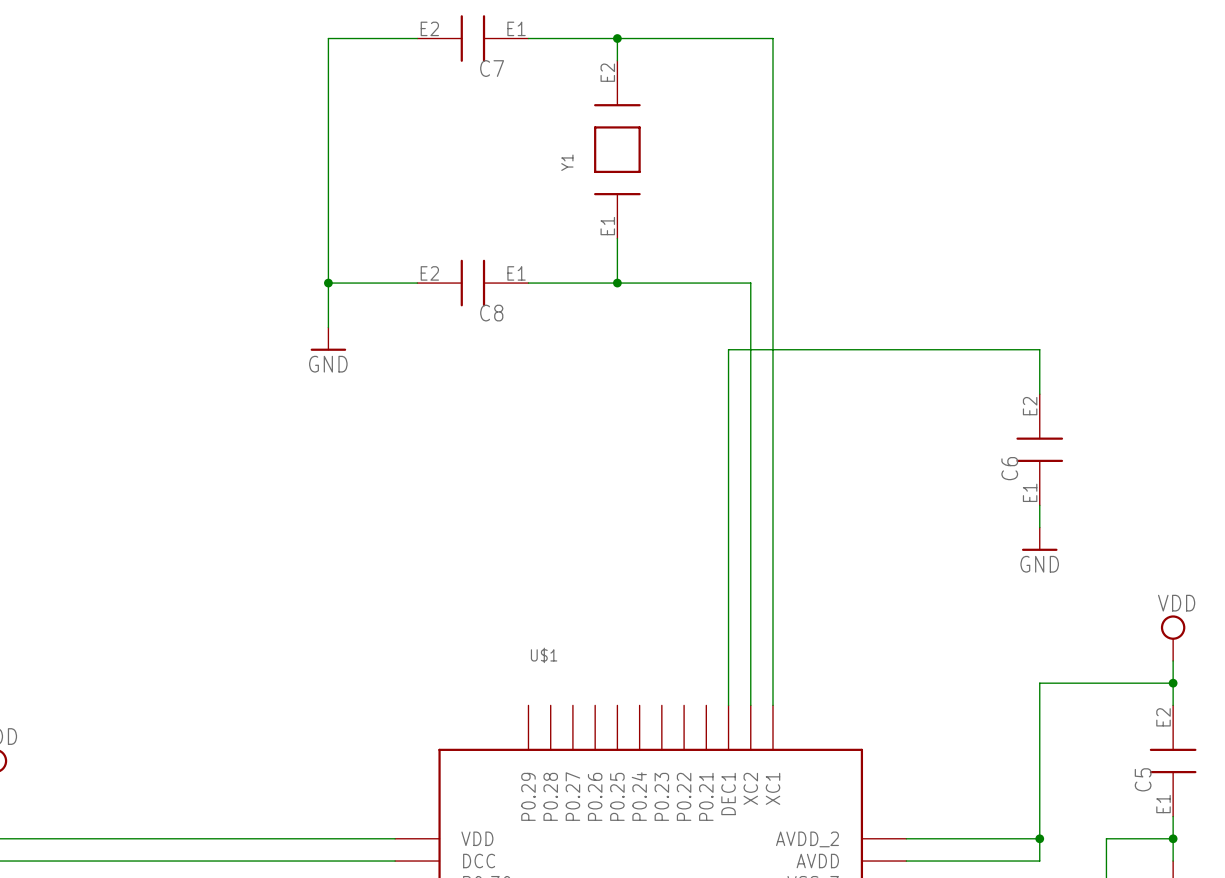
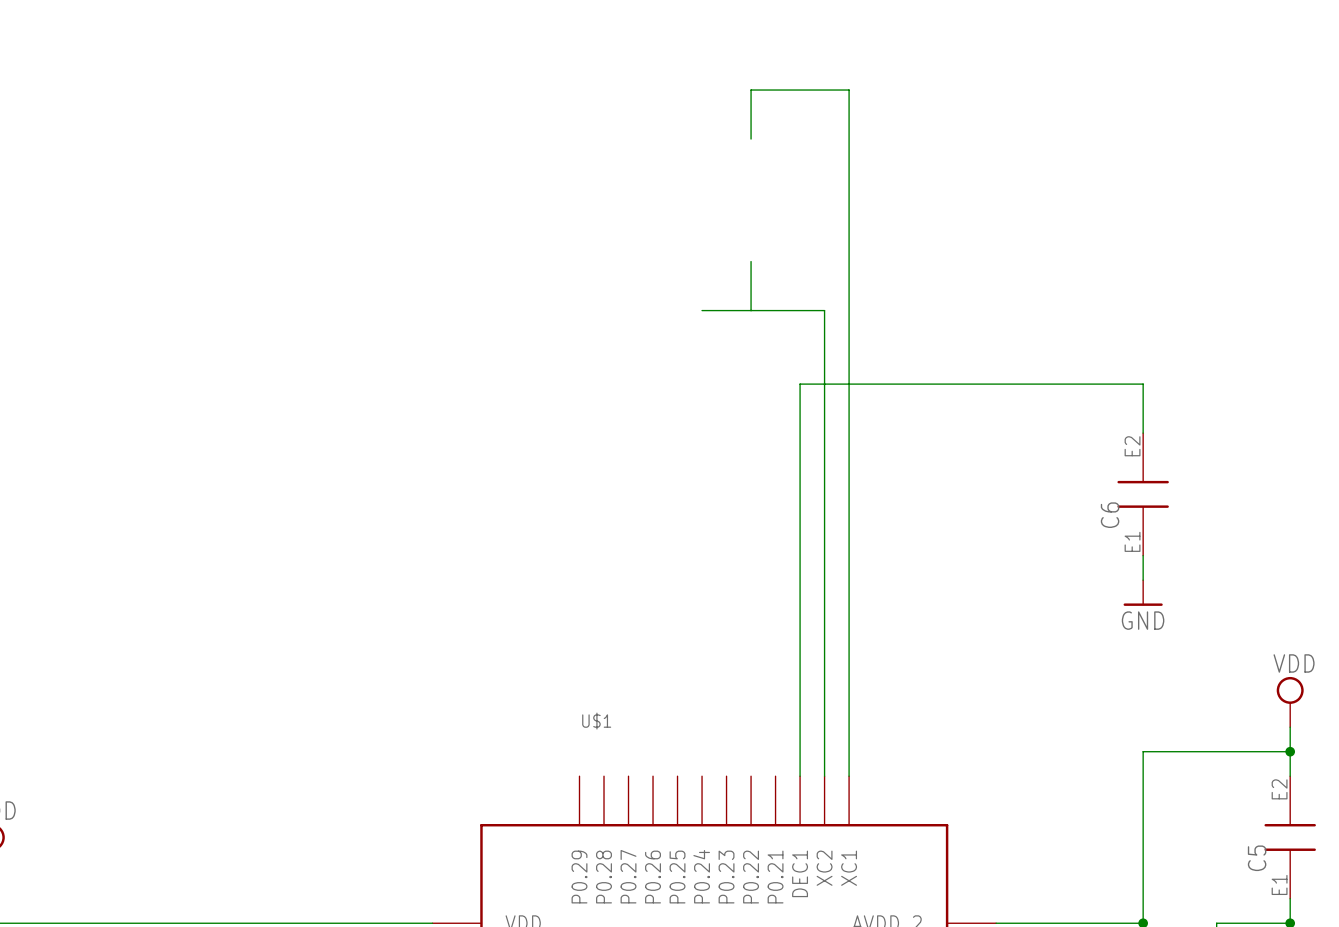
wire: (417, 38) (328, 38) (328, 327) -> none
C7: (472, 38) -> none
wire: (528, 38) (773, 38) (773, 82) -> (751, 139) (751, 90) (849, 90)
wire: (617, 38) (617, 60) -> none
junction: (617, 38) -> none
Y1: (617, 149) -> none
wire: (617, 238) (617, 283) -> (751, 261) (751, 310)
wire: (328, 283) (417, 283) -> none
junction: (328, 283) -> none
C8: (472, 283) -> none
wire: (528, 283) (639, 283) -> none
junction: (617, 283) -> none
power symbol: GND (328, 339) -> none

